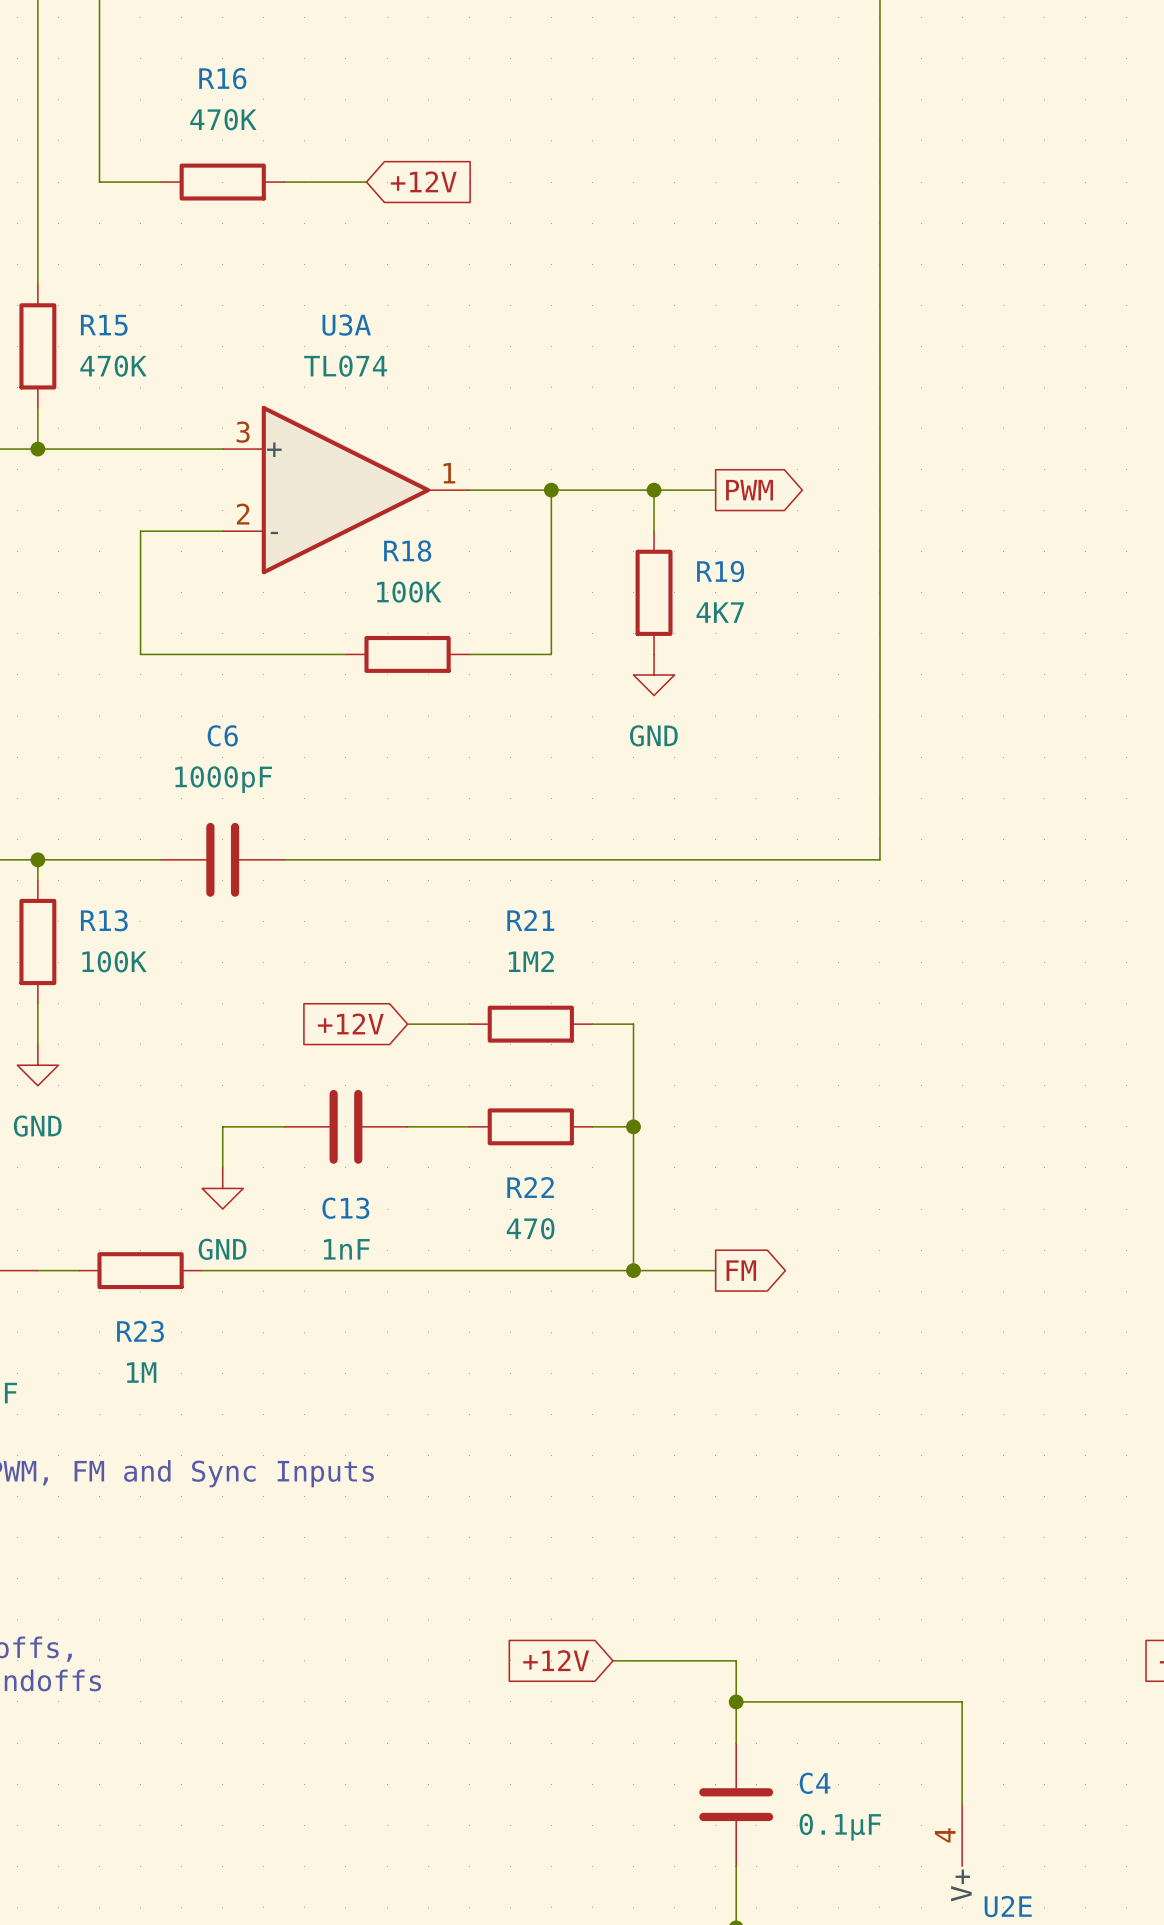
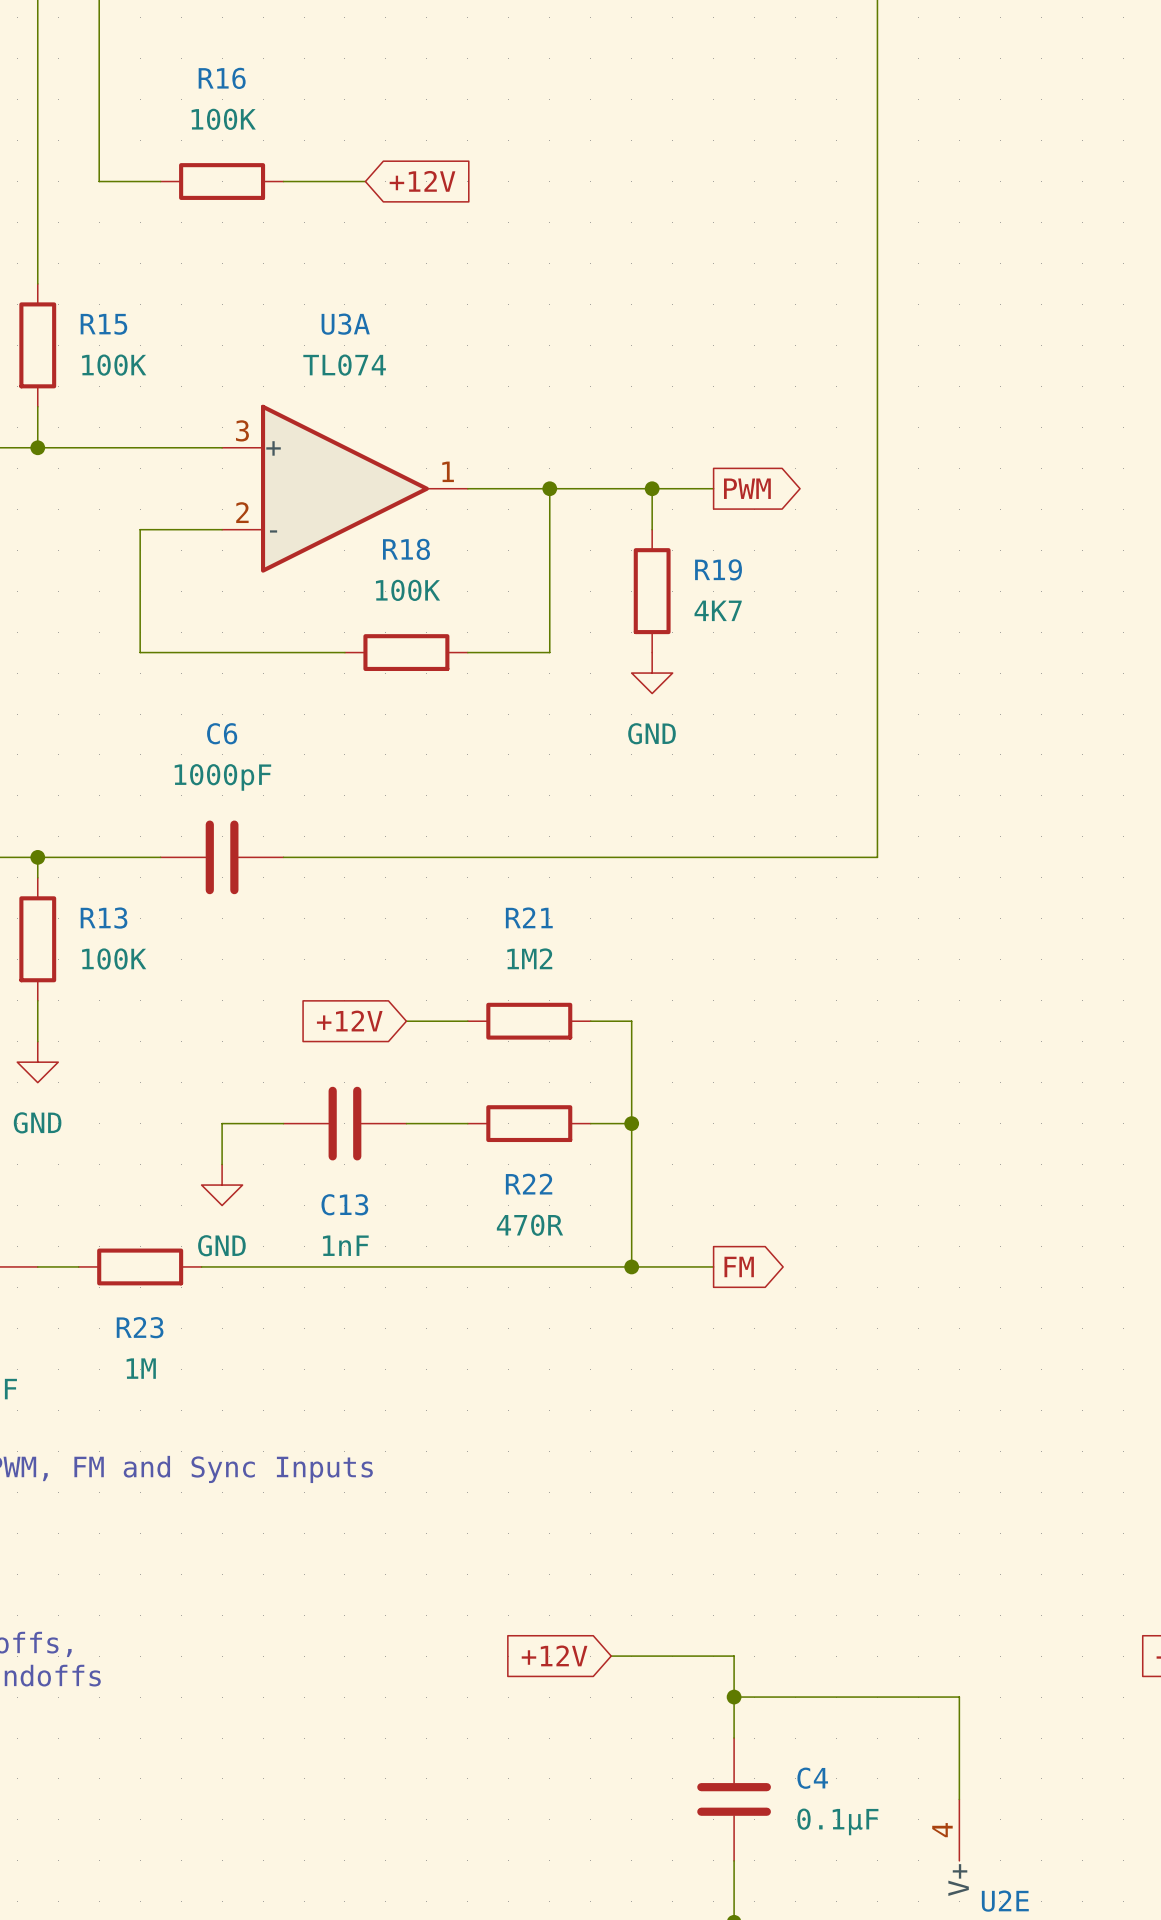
R16 value: 470K (223, 119) -> 100K (223, 119)
R15 value: 470K (113, 366) -> 100K (114, 365)
R22 value: 470 (530, 1228) -> 470R (529, 1225)

